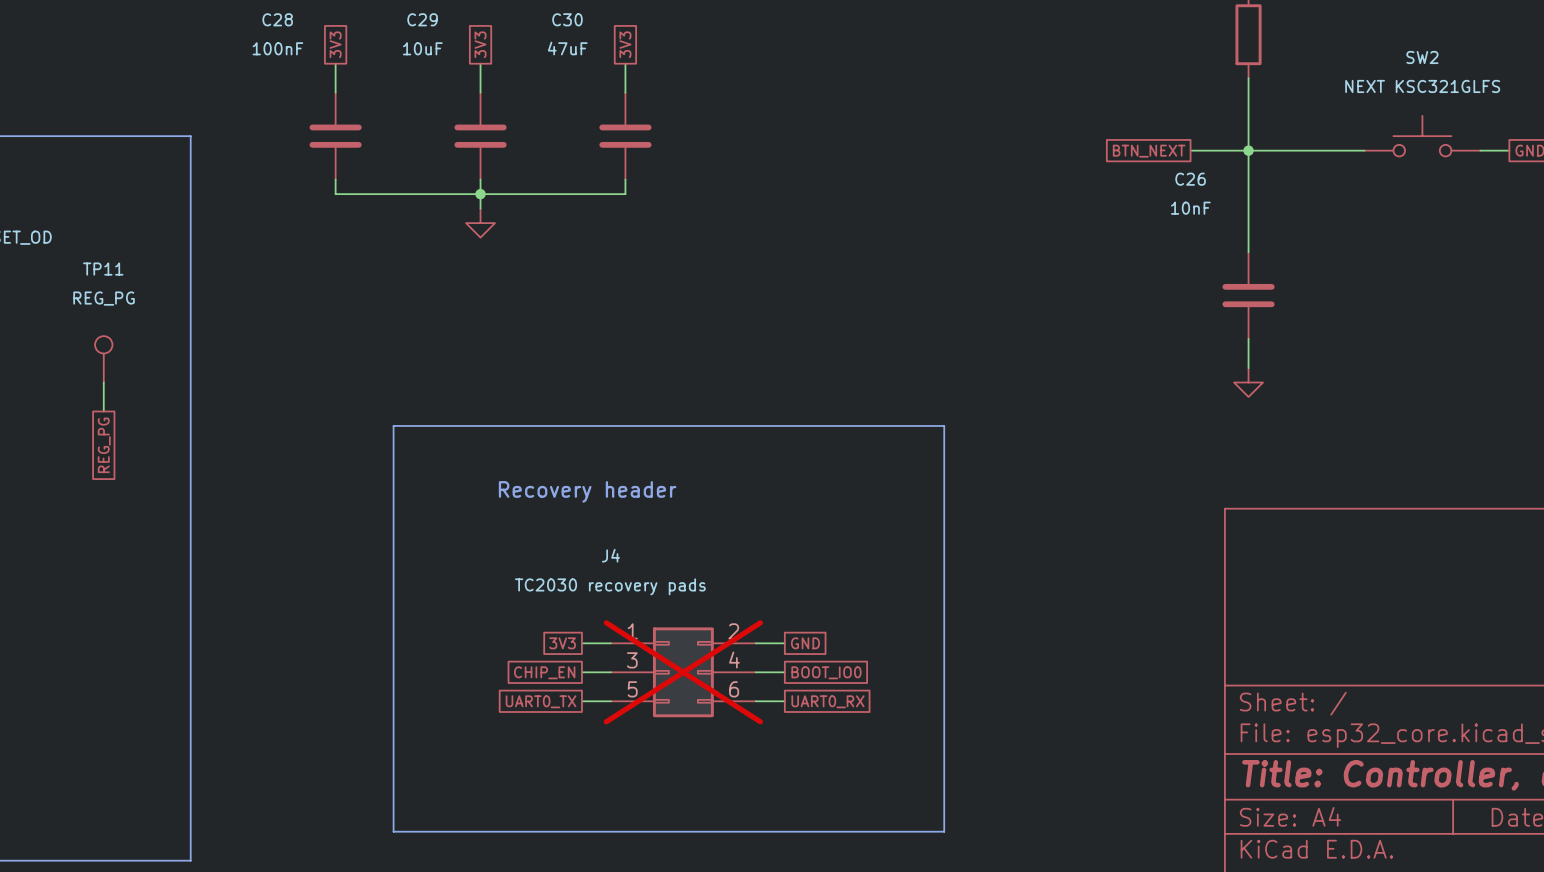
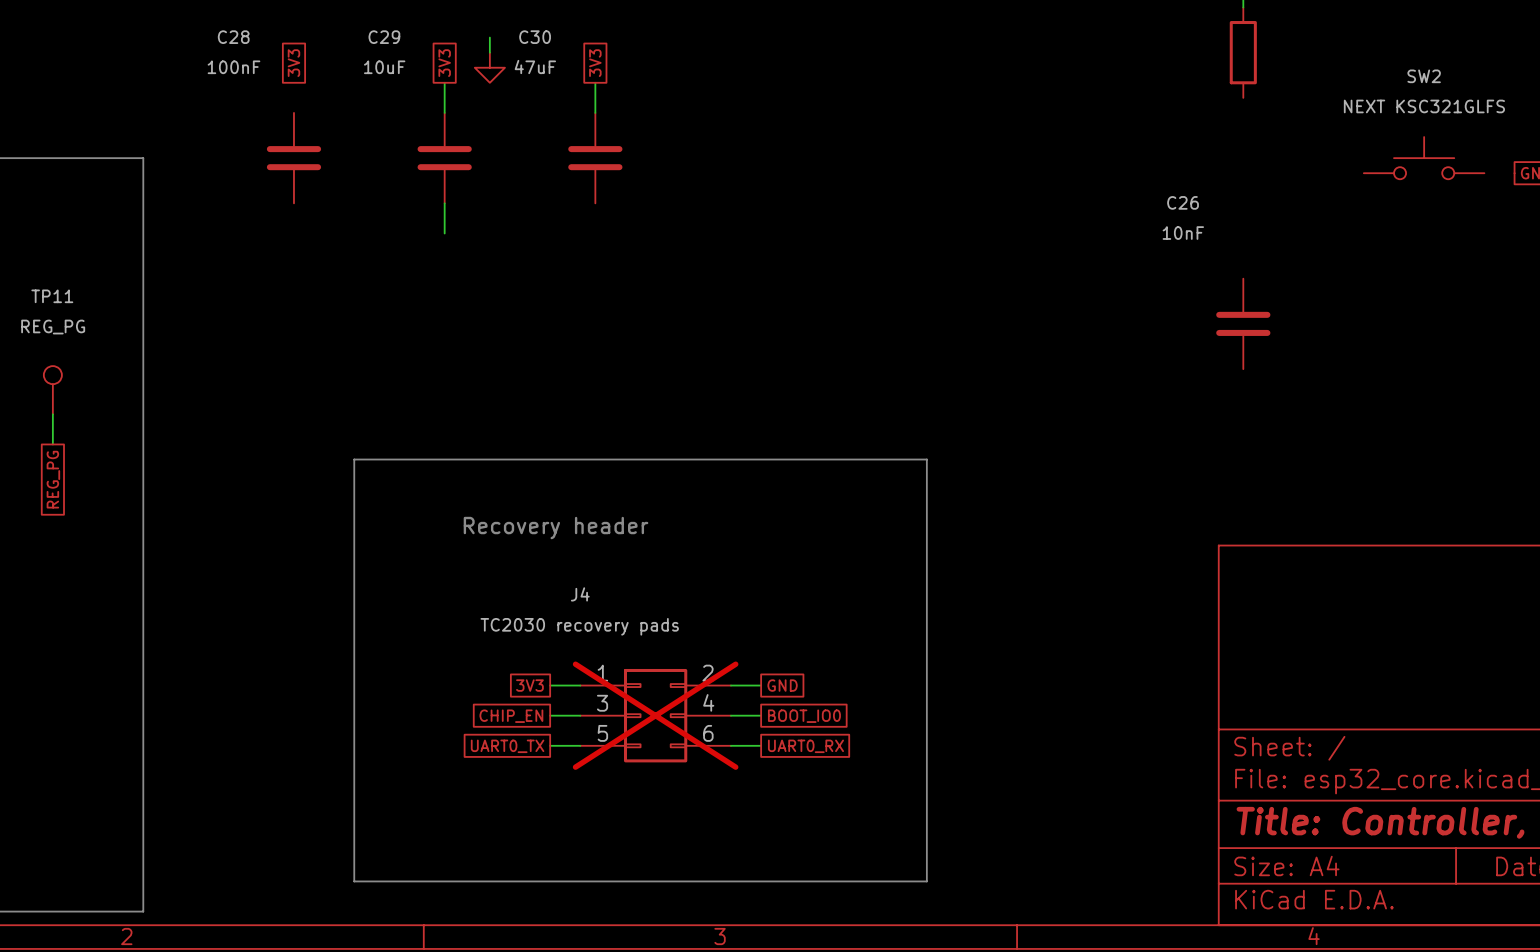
wire: none -> (489, 37) (489, 52)
wire: (335, 63) (335, 92) -> none
wire: (1248, 78) (1248, 252) -> none
wire: (1190, 150) (1364, 150) -> none
junction: (1248, 150) -> none
wire: (1480, 150) (1509, 150) -> none
global label: BTN_NEXT (1149, 151) -> none
wire: (335, 179) (335, 194) (625, 194) (625, 179) -> none
junction: (480, 194) -> none
power symbol position: (480, 223) -> (489, 67)
wire: (1248, 339) (1248, 368) -> none
power symbol: (1248, 382) -> none

